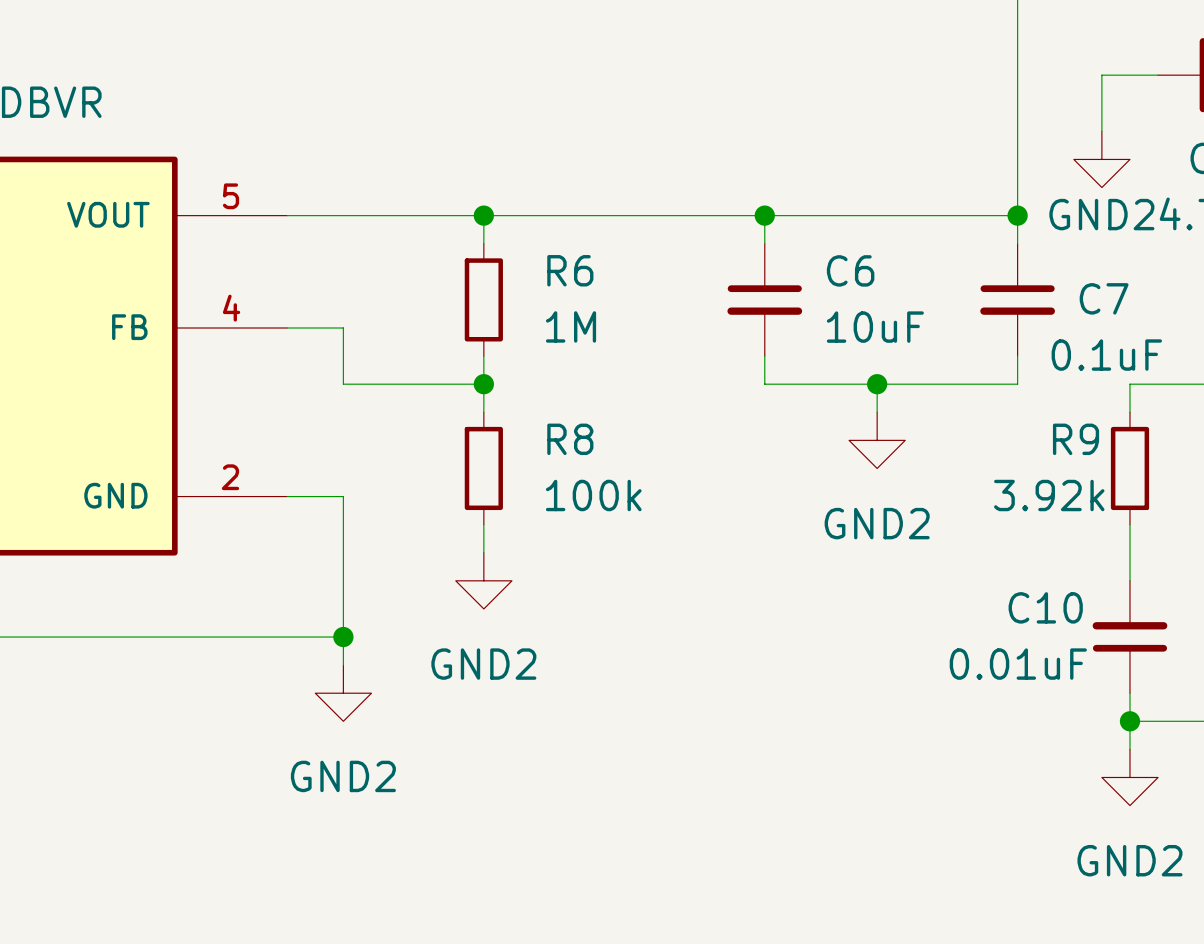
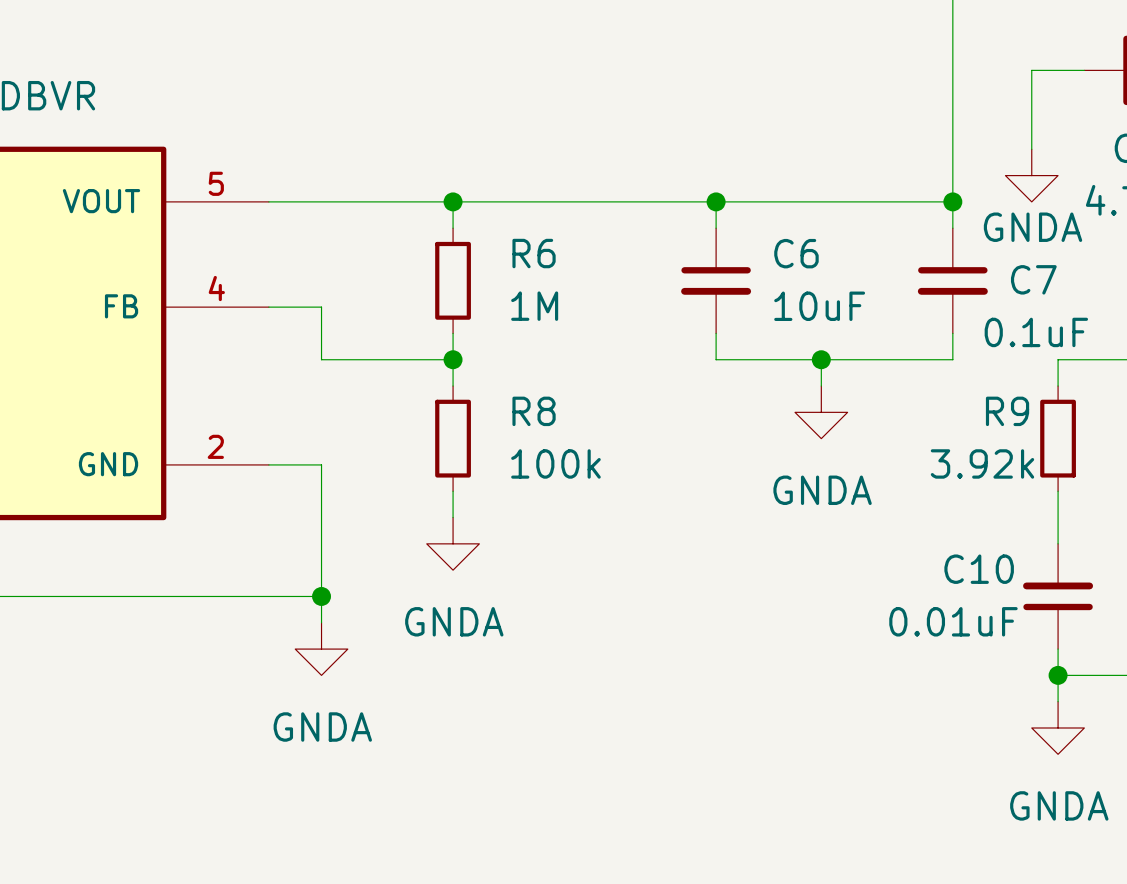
power symbol: GND2 (1101, 159) -> none
power symbol: none -> GNDA (1031, 175)
power symbol: GND2 (877, 440) -> GNDA (821, 412)
power symbol: GND2 (483, 580) -> GNDA (453, 543)
power symbol: GND2 (343, 693) -> GNDA (321, 649)
power symbol: GND2 (1129, 777) -> GNDA (1058, 727)

